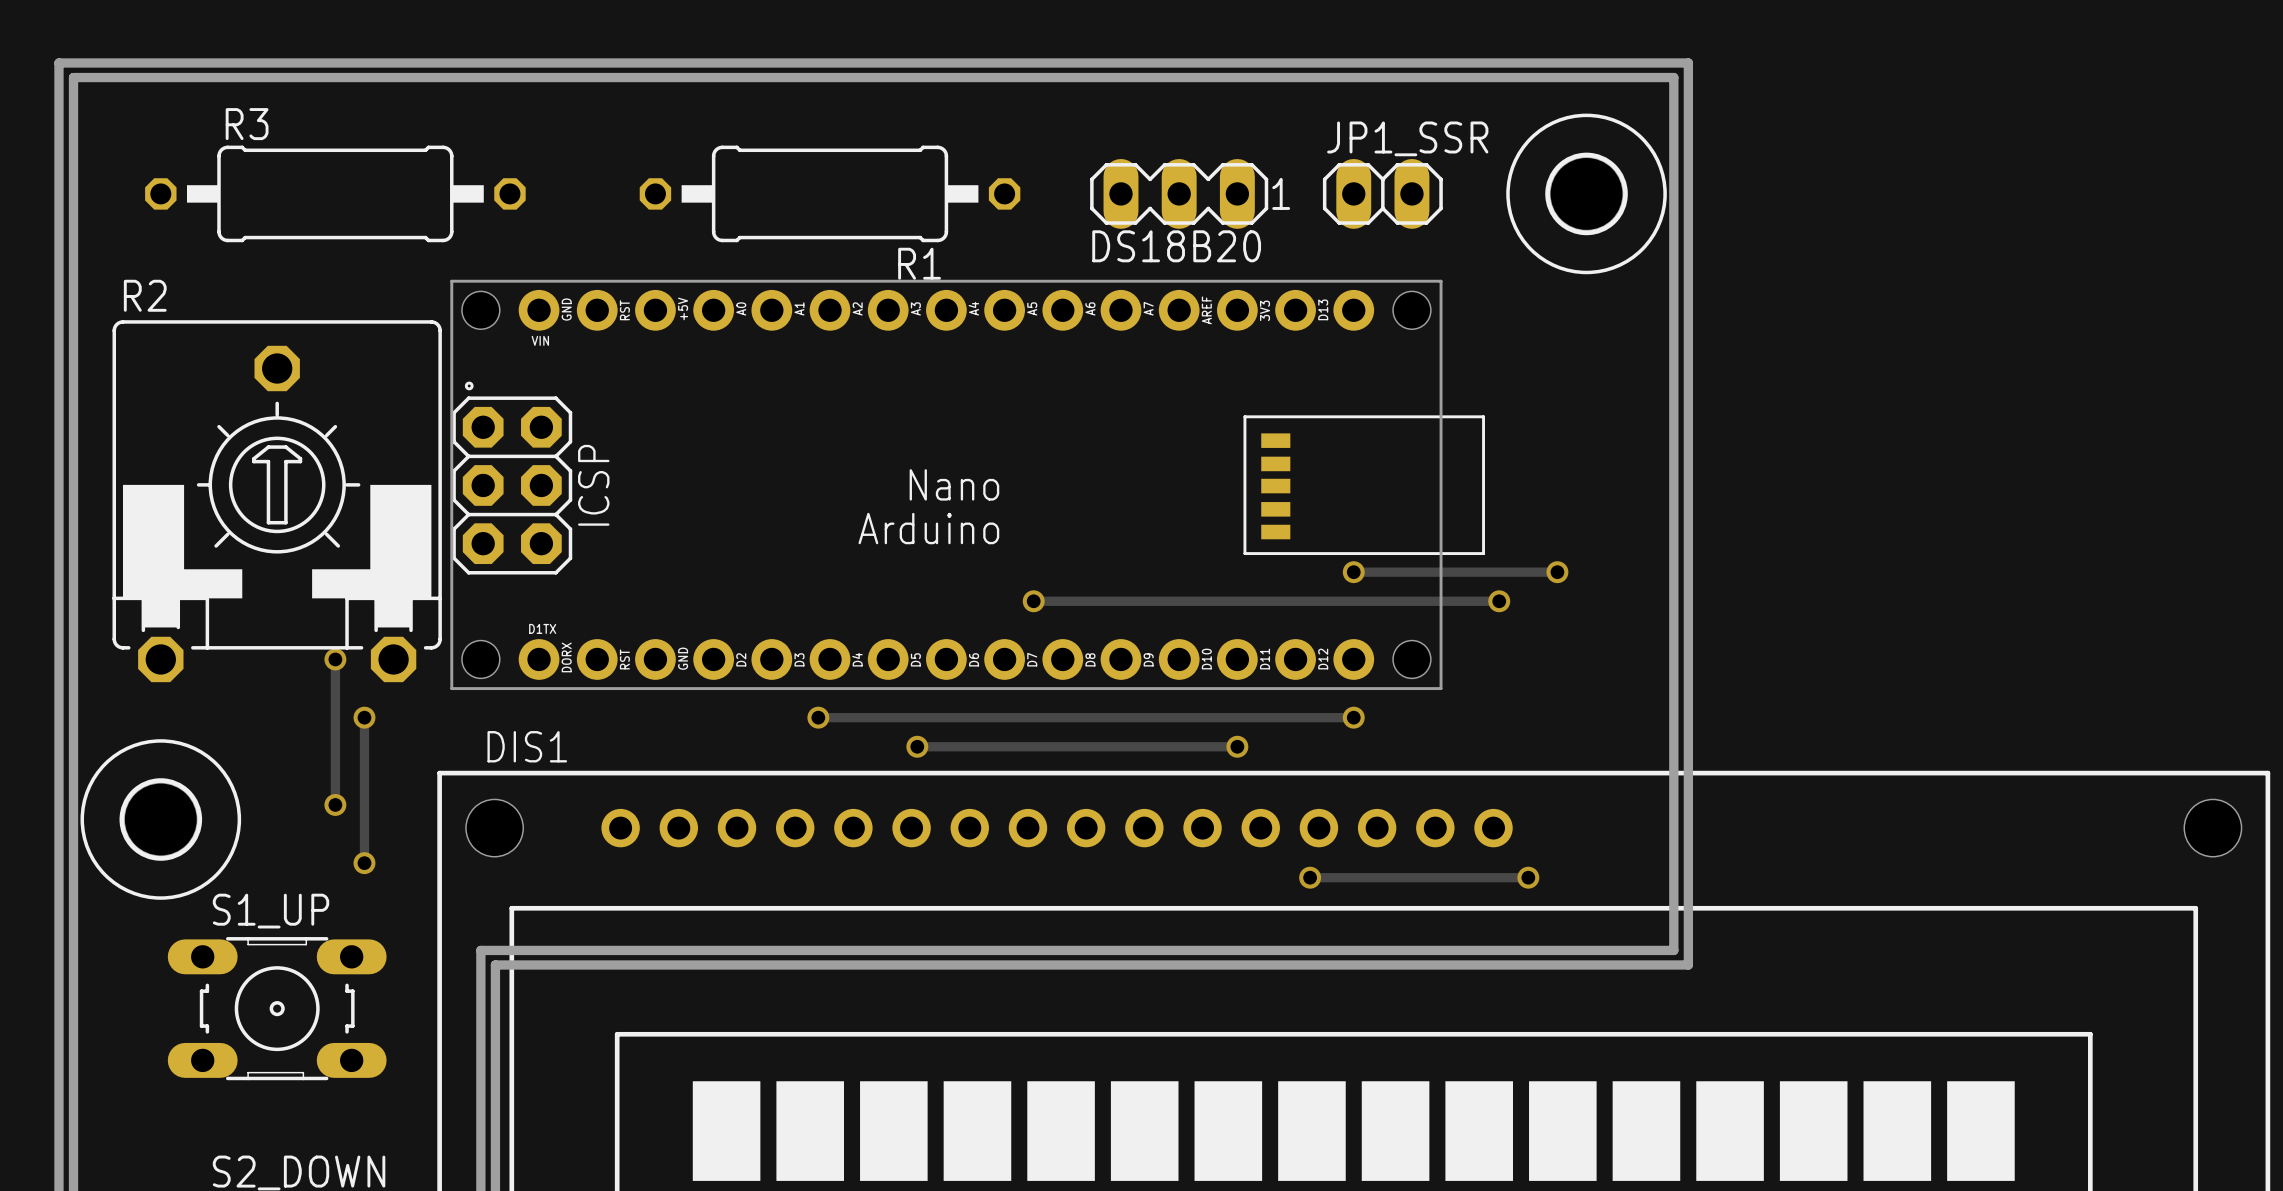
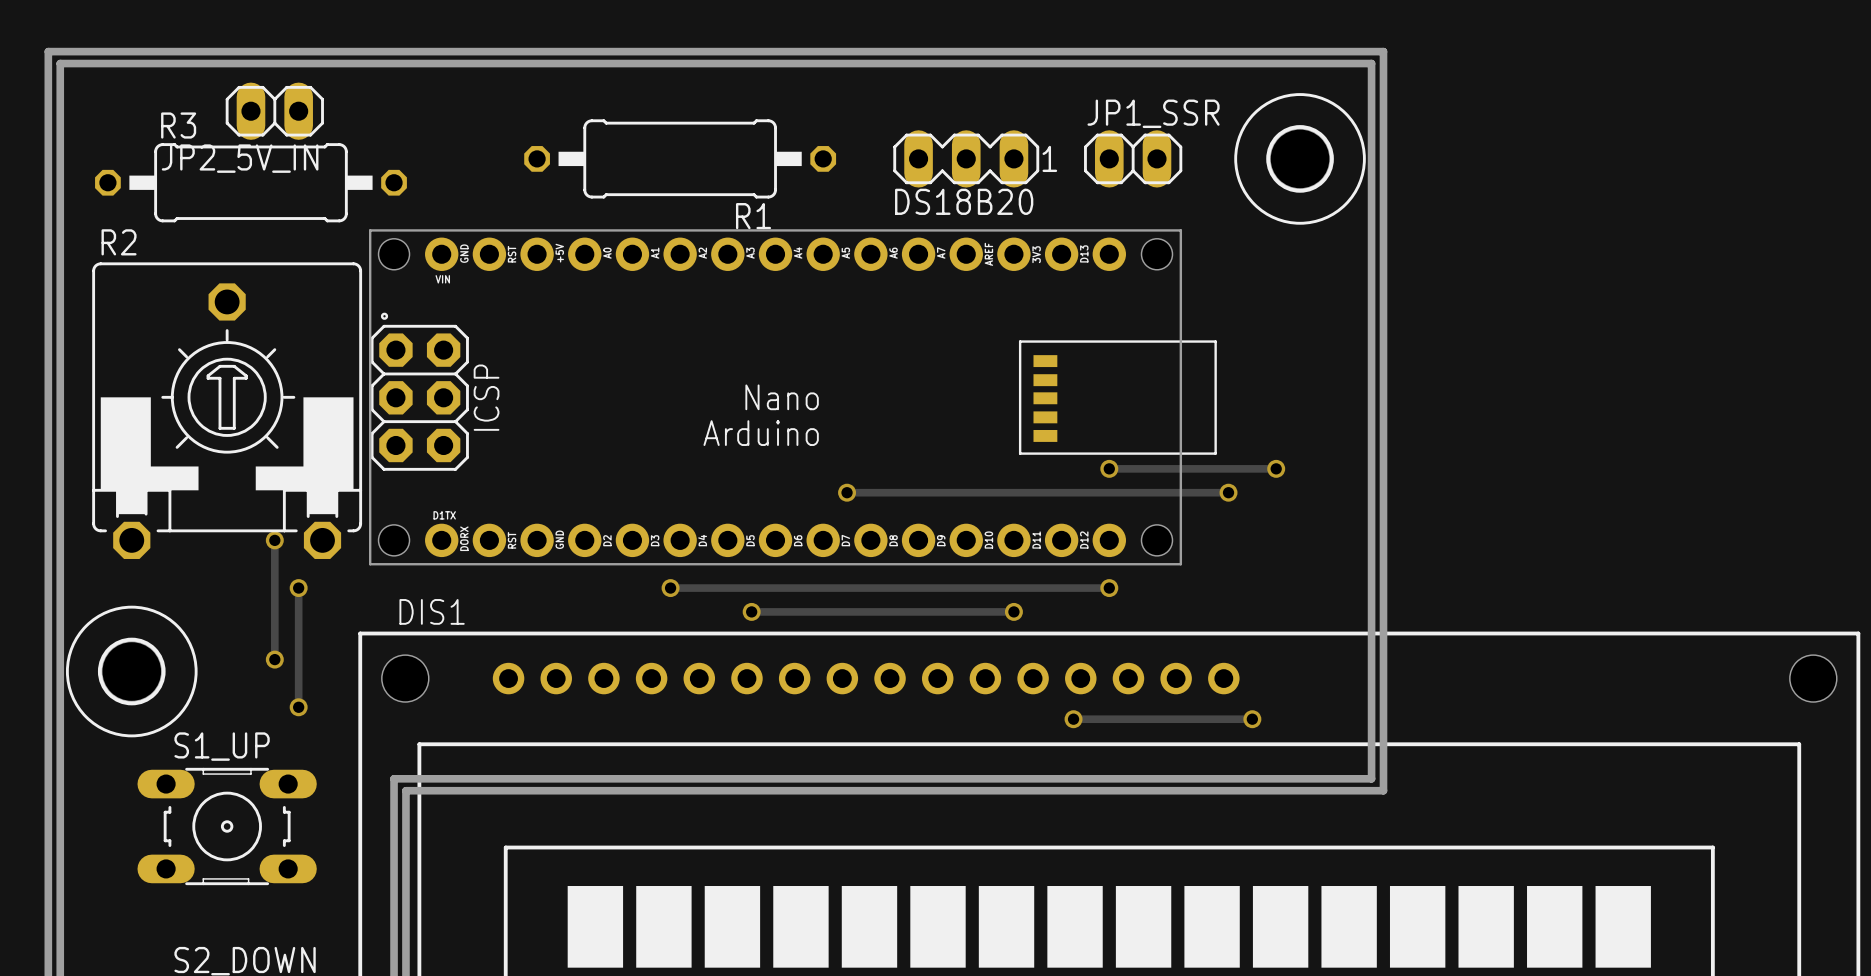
JP2_5V_IN: none -> (274, 111)
R3 position: (335, 193) -> (250, 182)

